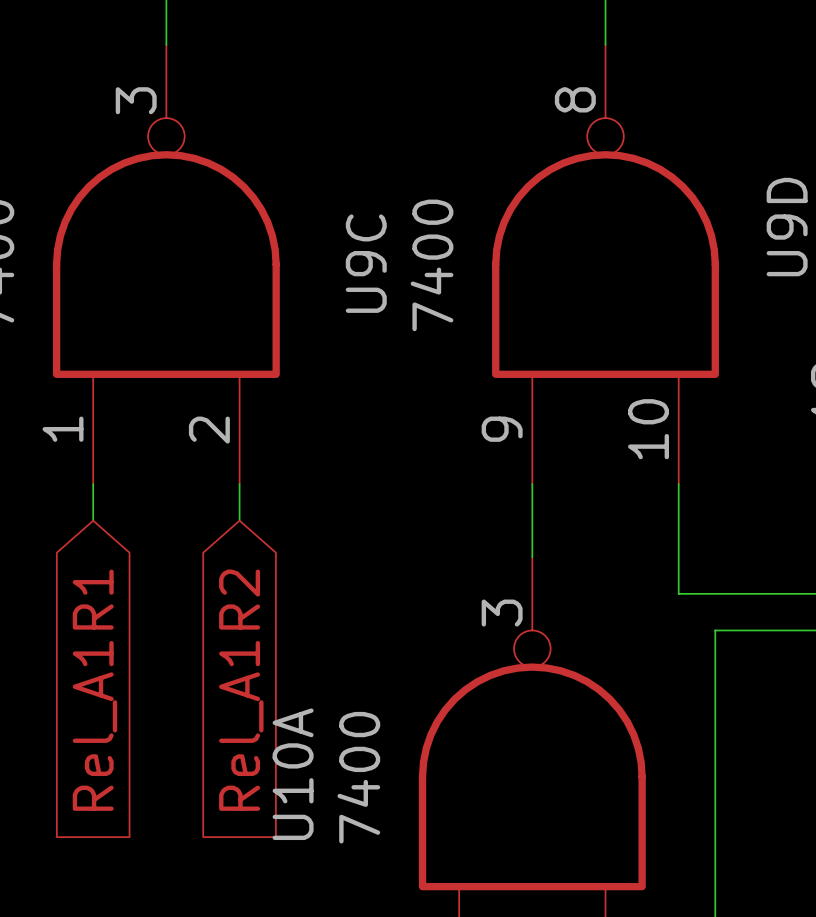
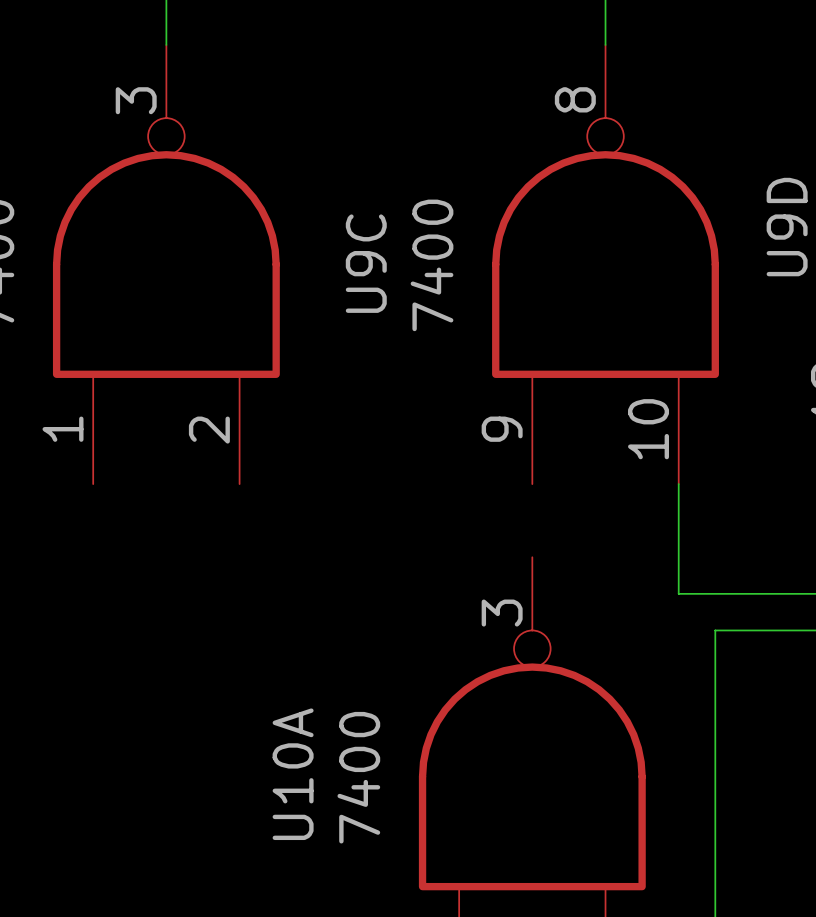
wire: (93, 484) (93, 520) -> none
wire: (239, 484) (239, 520) -> none
wire: (532, 484) (532, 557) -> none
global label: Rel_A1R1 (94, 690) -> none
global label: Rel_A1R2 (241, 690) -> none

